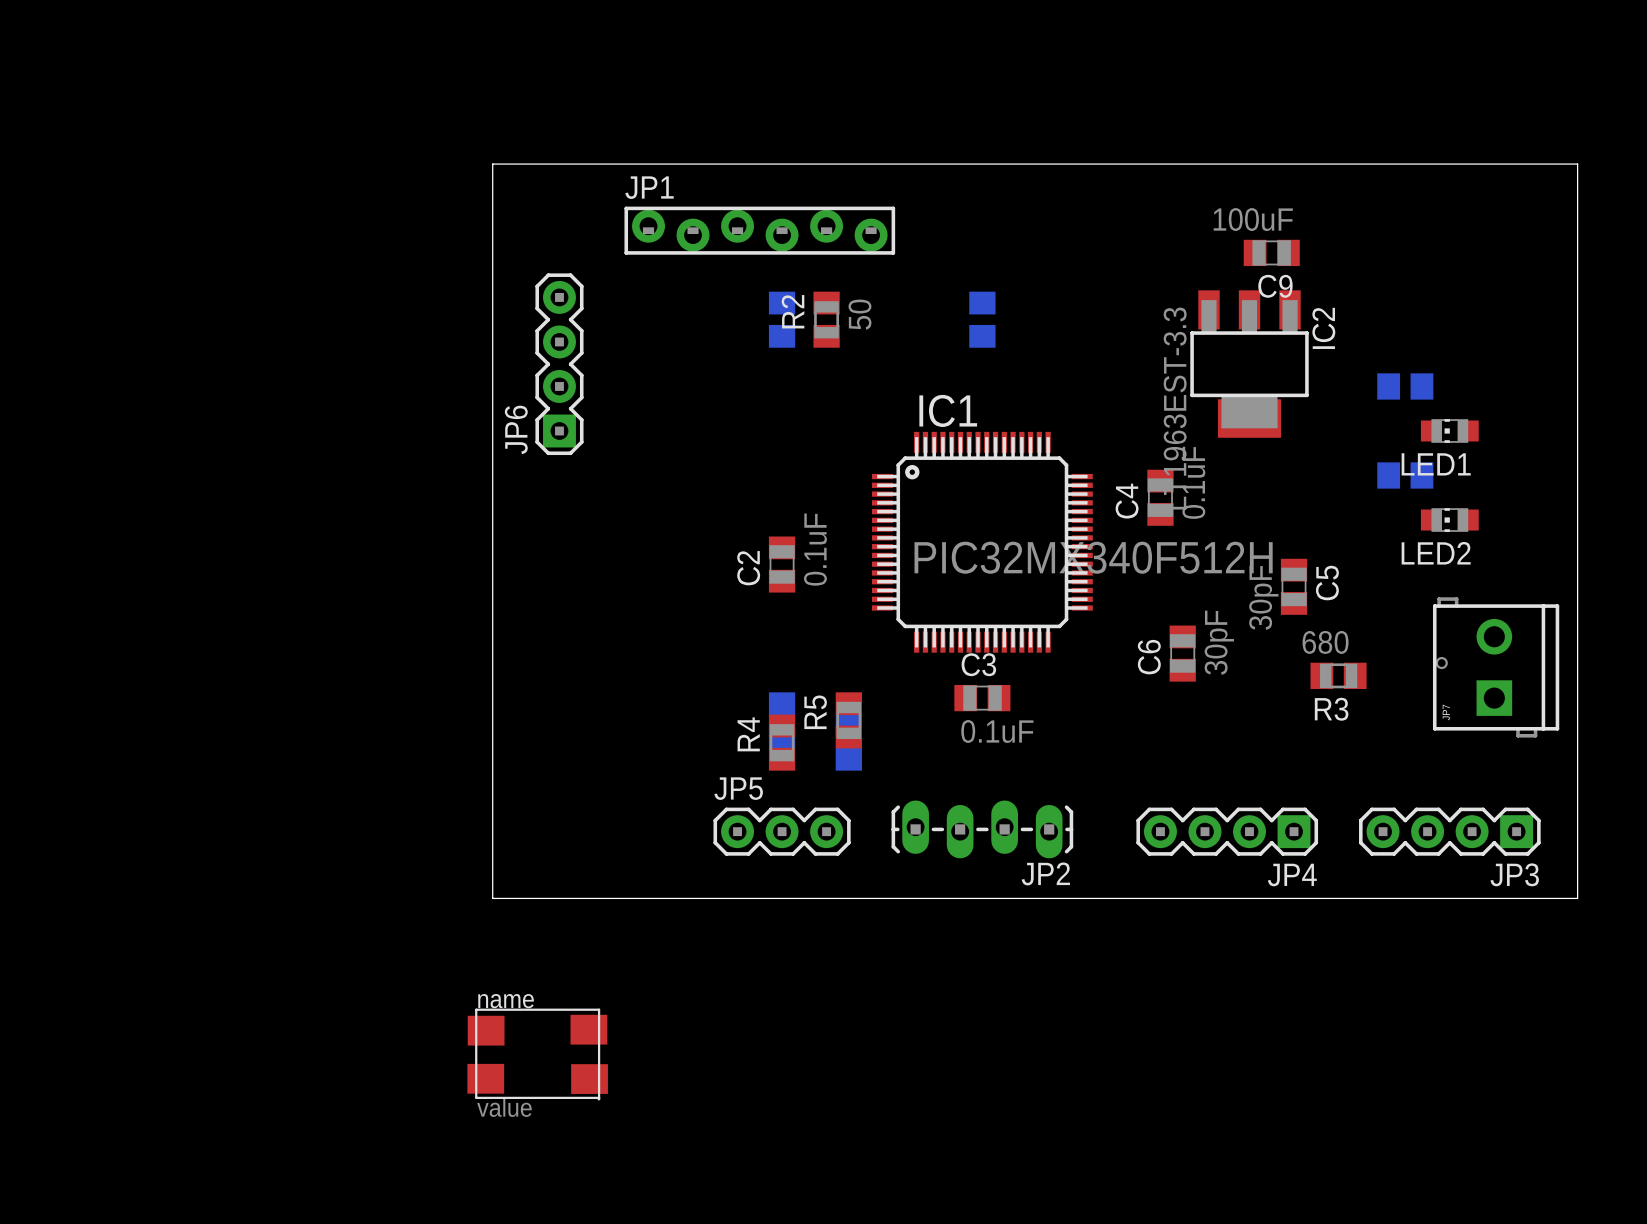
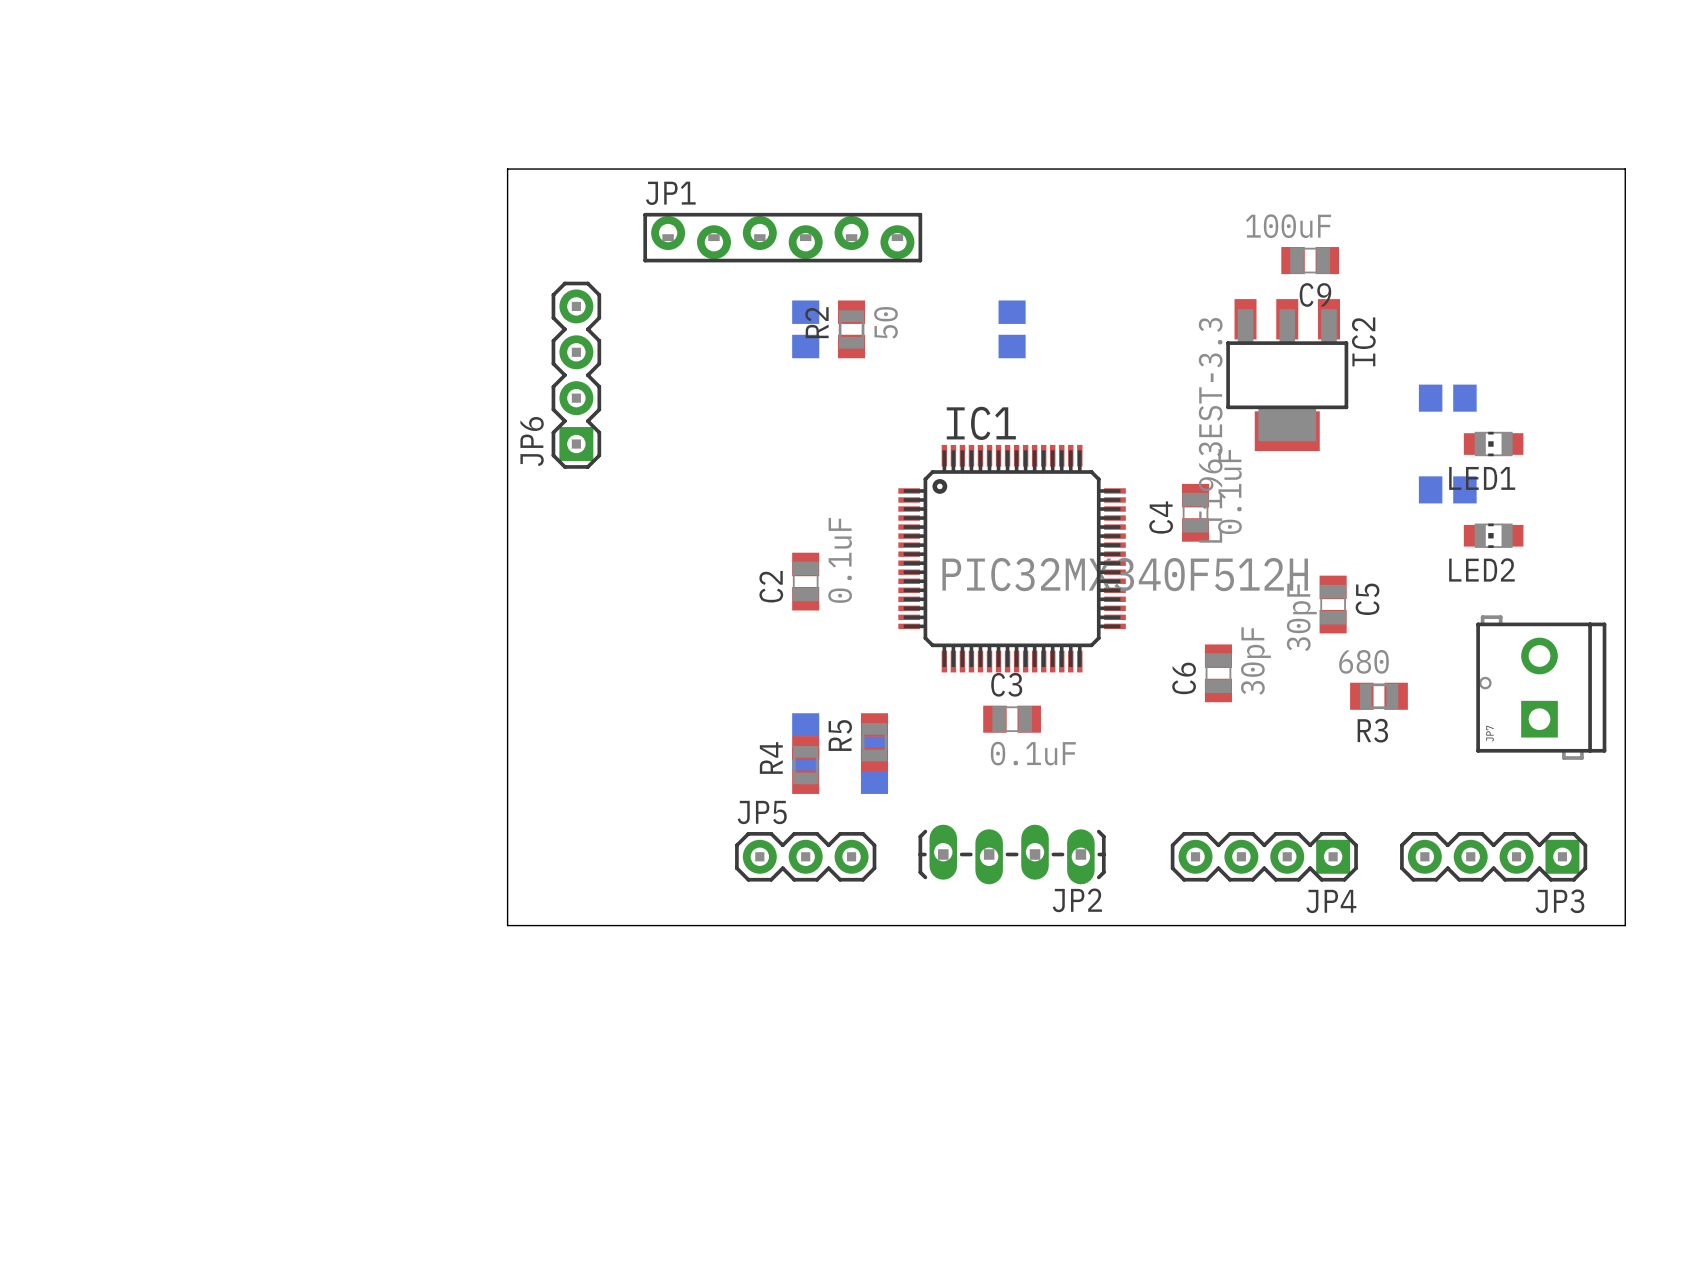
part: (537, 1054) -> none

